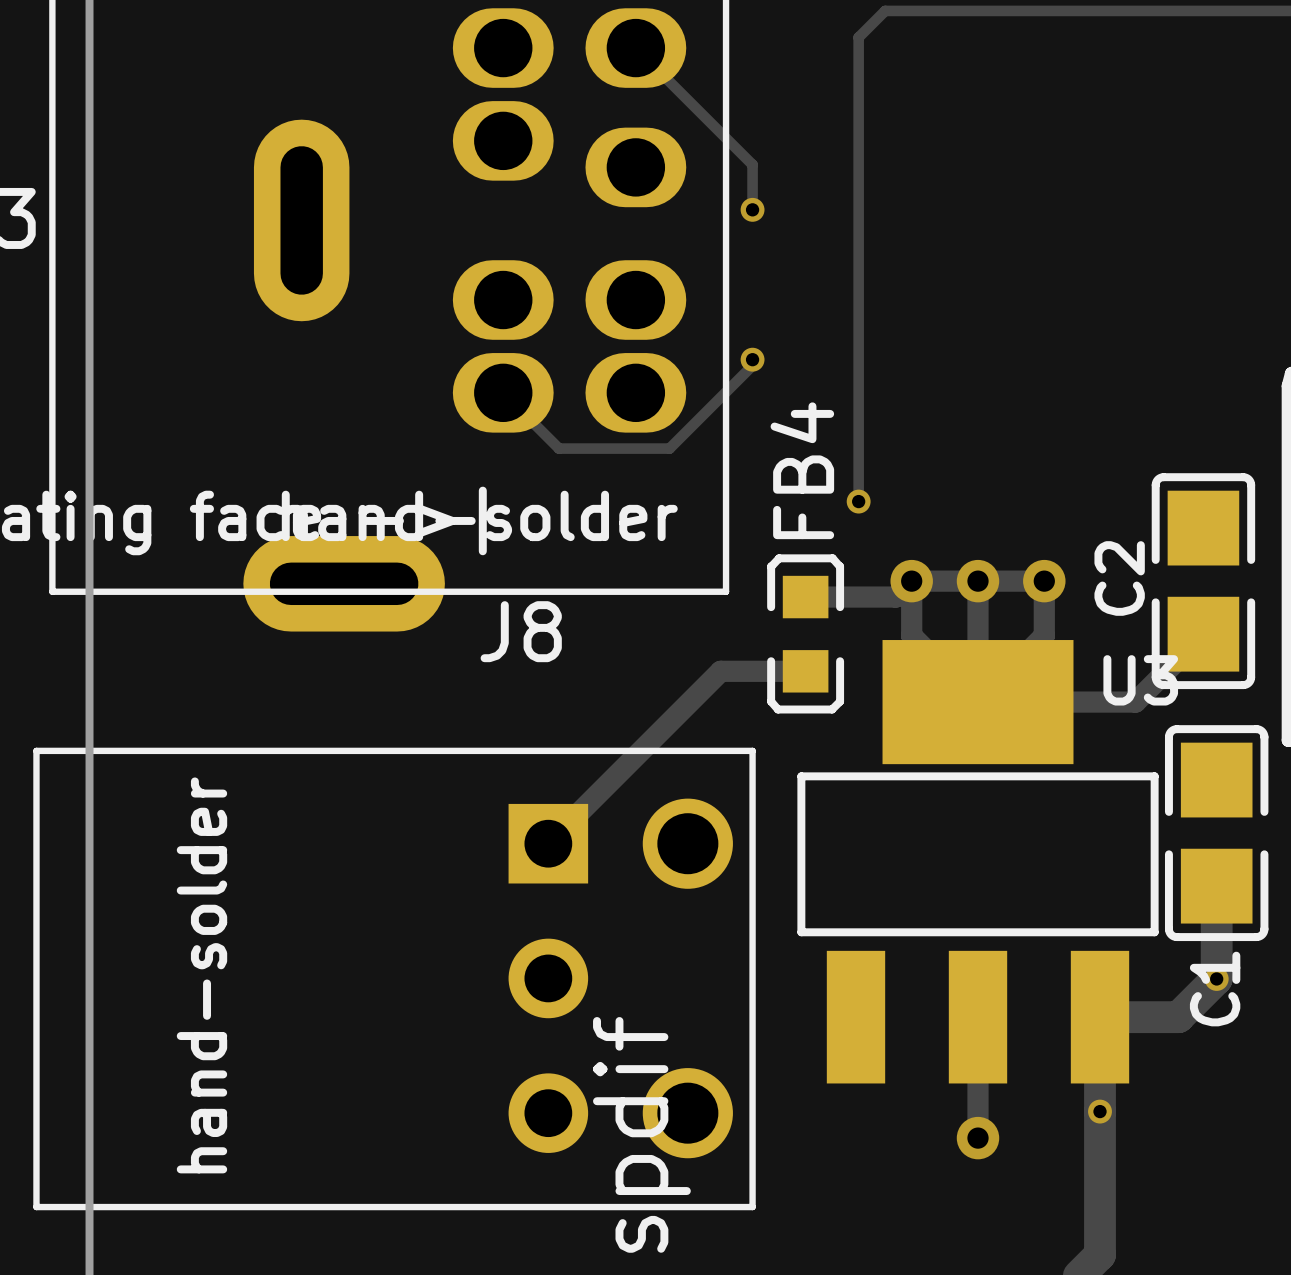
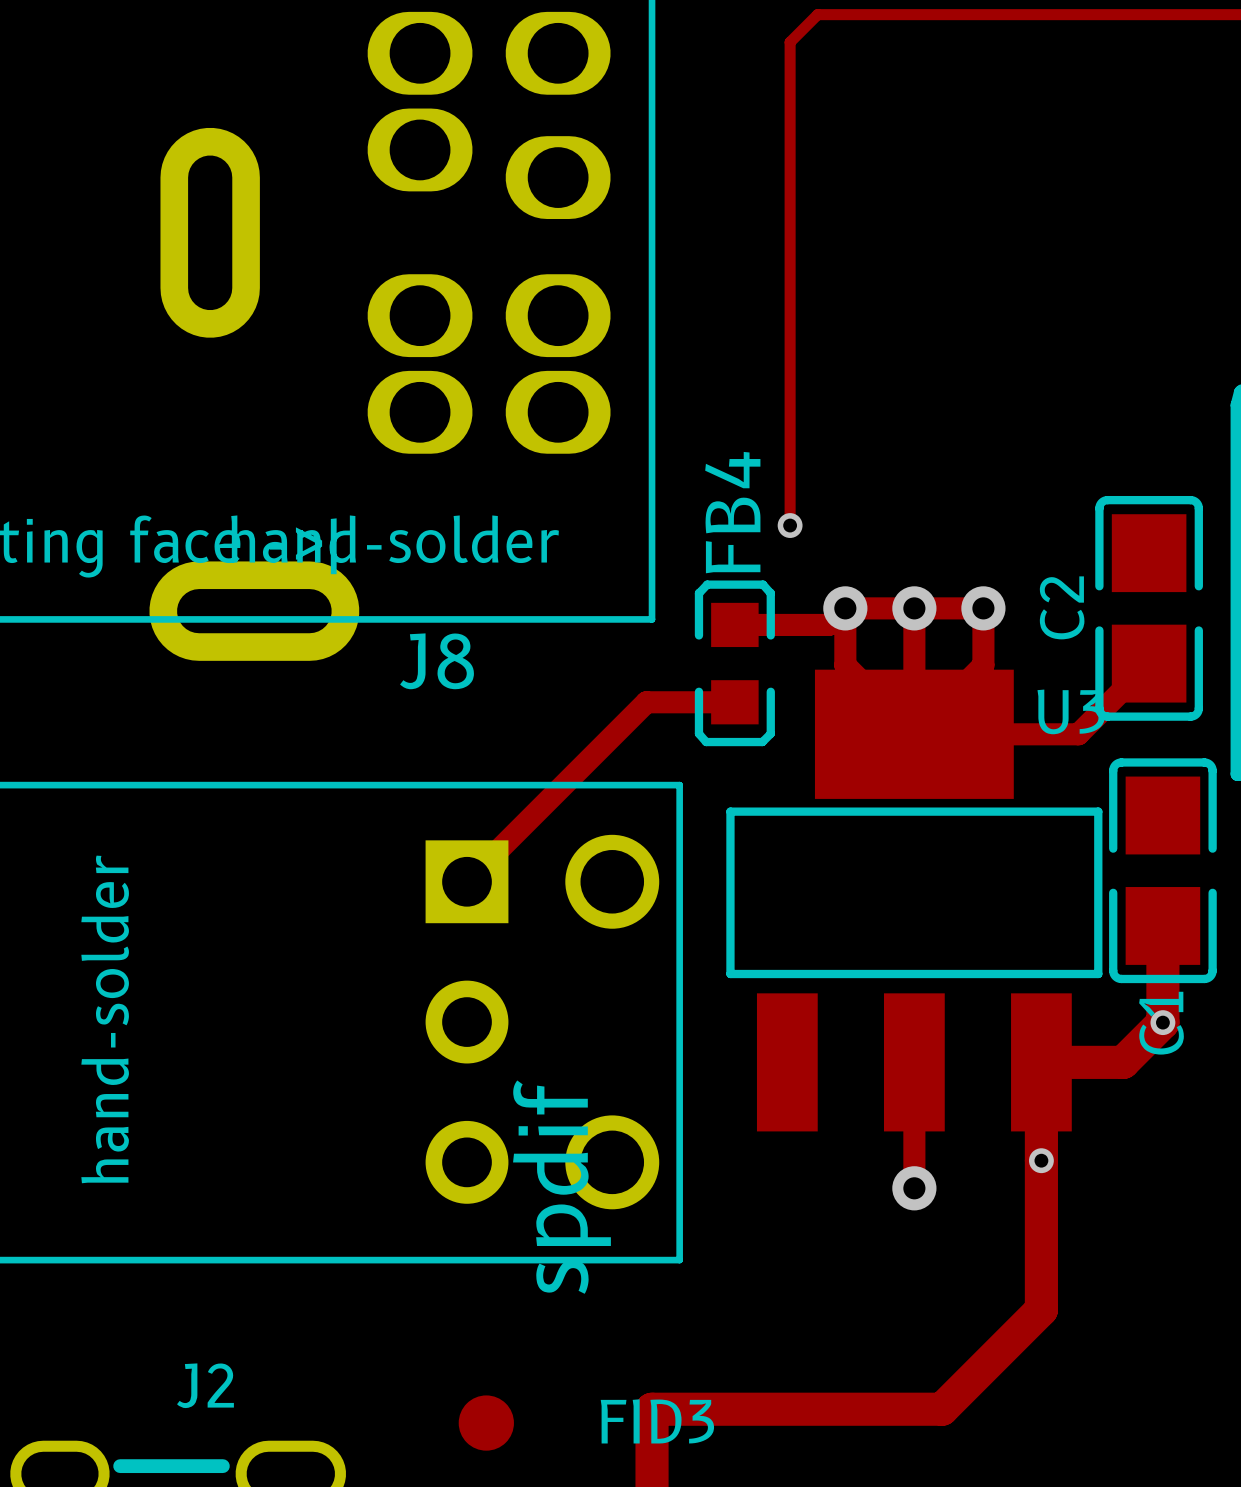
track: (635, 48) (752, 164) (752, 209) -> none
via: (752, 209) -> none
track: (752, 359) (752, 365) (669, 448) (559, 448) (503, 392) -> none
via: (752, 359) -> none

